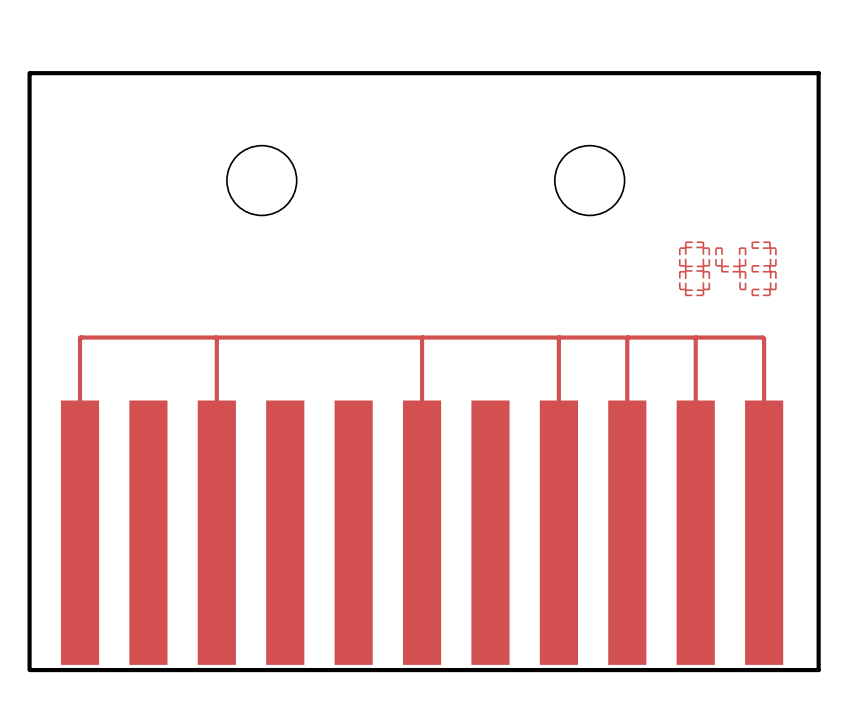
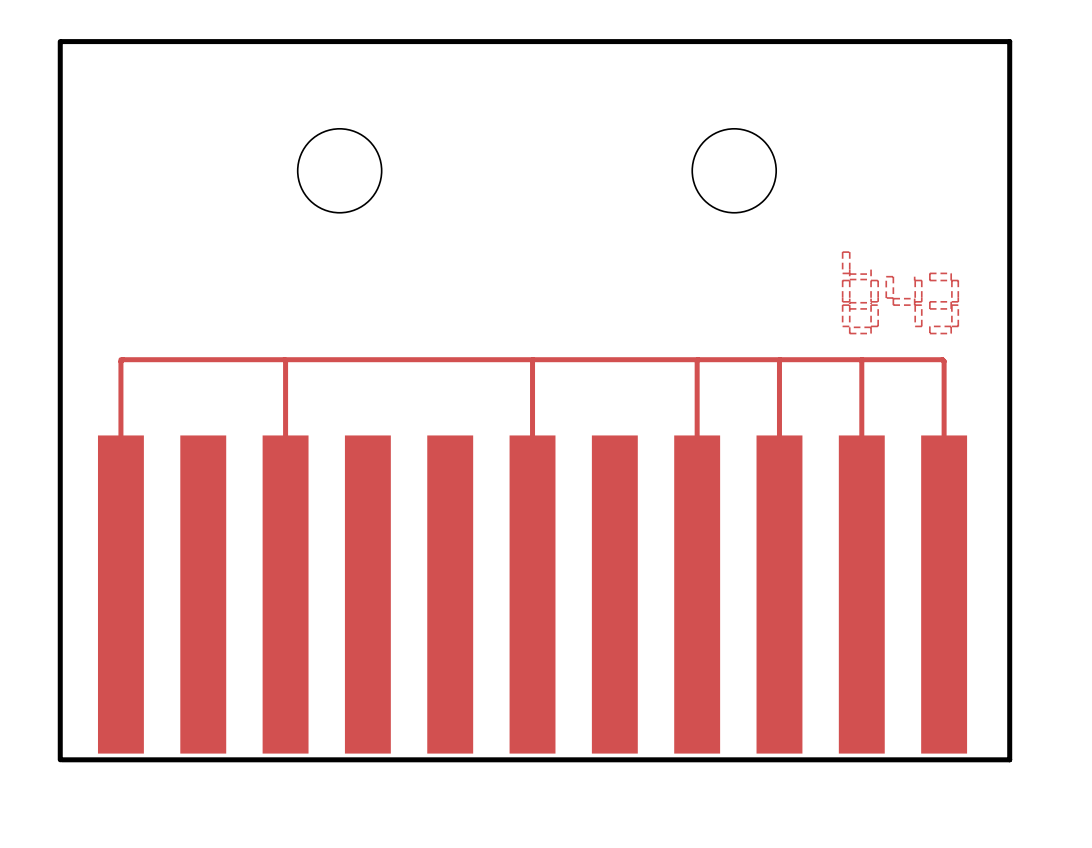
zone outline: (685, 242) (685, 247) (703, 247) (703, 242) (685, 242) -> (849, 327) (849, 333) (871, 333) (871, 327) (849, 327)
zone outline: (752, 242) (770, 242) (770, 248) (752, 248) (752, 242) -> (893, 298) (914, 298) (914, 305) (893, 305) (893, 298)
zone outline: (716, 248) (721, 248) (721, 265) (716, 265) (716, 248) -> none
zone outline: (739, 248) (745, 248) (745, 265) (739, 265) (739, 248) -> (915, 305) (921, 305) (921, 326) (915, 326) (915, 305)
zone outline: (770, 248) (775, 248) (775, 265) (770, 265) (770, 248) -> (951, 305) (958, 305) (958, 326) (951, 326) (951, 305)
zone outline: (703, 262) (703, 248) (709, 248) (709, 265) (703, 265) -> none
zone outline: (721, 268) (721, 266) (739, 266) (739, 268) -> (893, 276) (886, 276) (886, 298) (893, 298) (893, 280)
zone outline: (721, 271) (739, 271) -> none
zone outline: (685, 291) (685, 292) -> (849, 305) (842, 305) (842, 326) (849, 326) (849, 308)
zone outline: (703, 291) (703, 292) -> (871, 305) (878, 305) (878, 326) (871, 326) (871, 308)
zone outline: none -> (929, 326) (951, 326) (951, 333) (929, 333) (929, 326)

